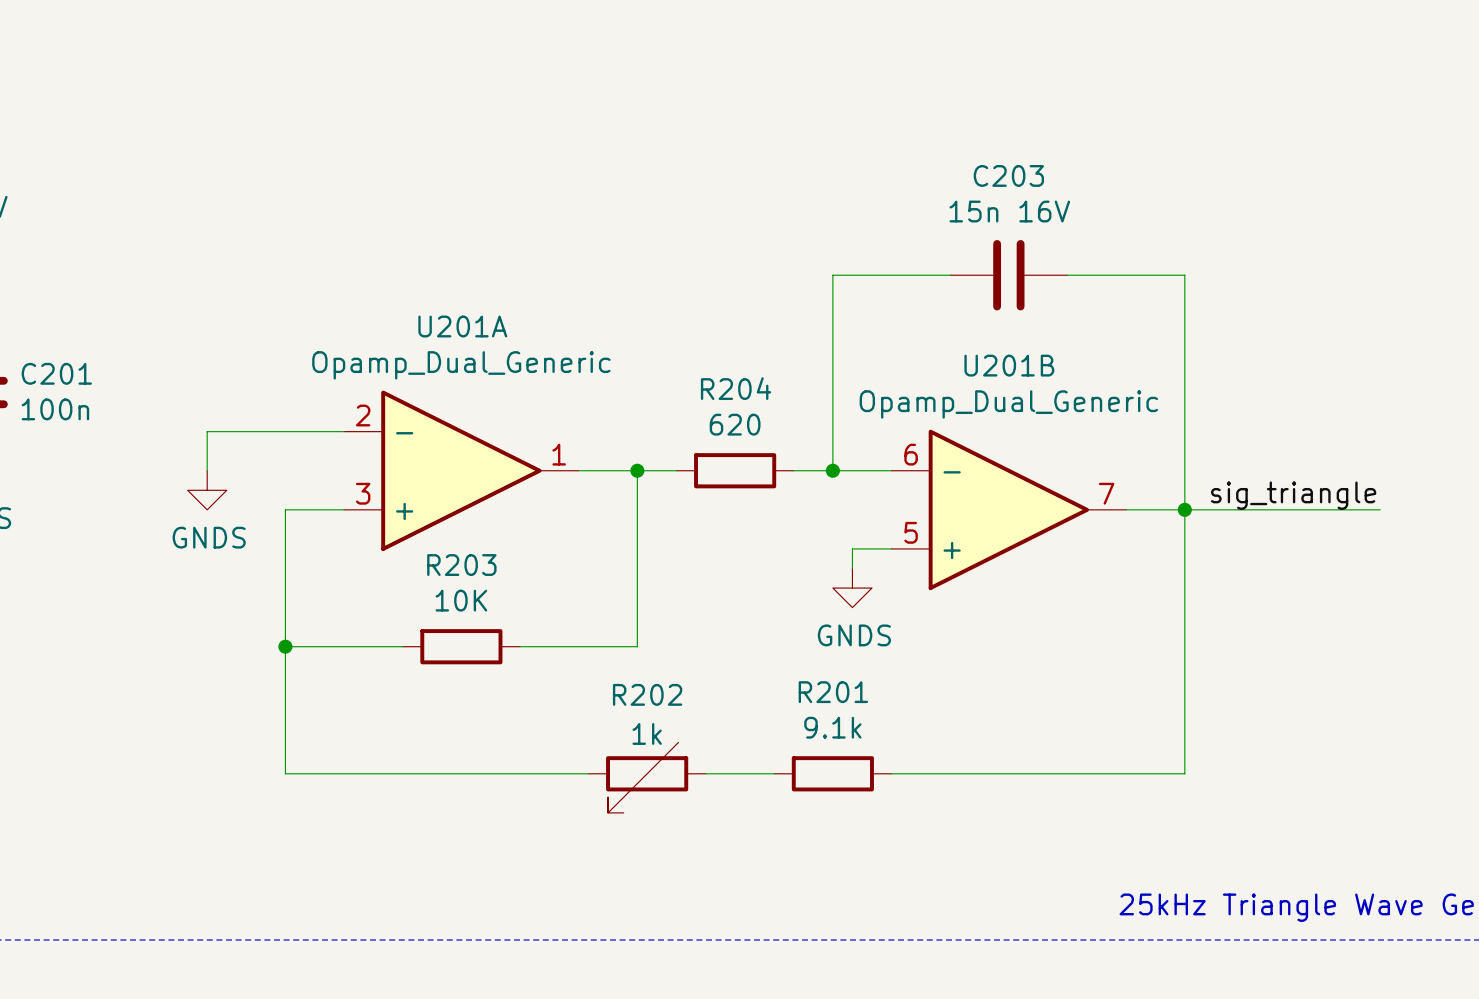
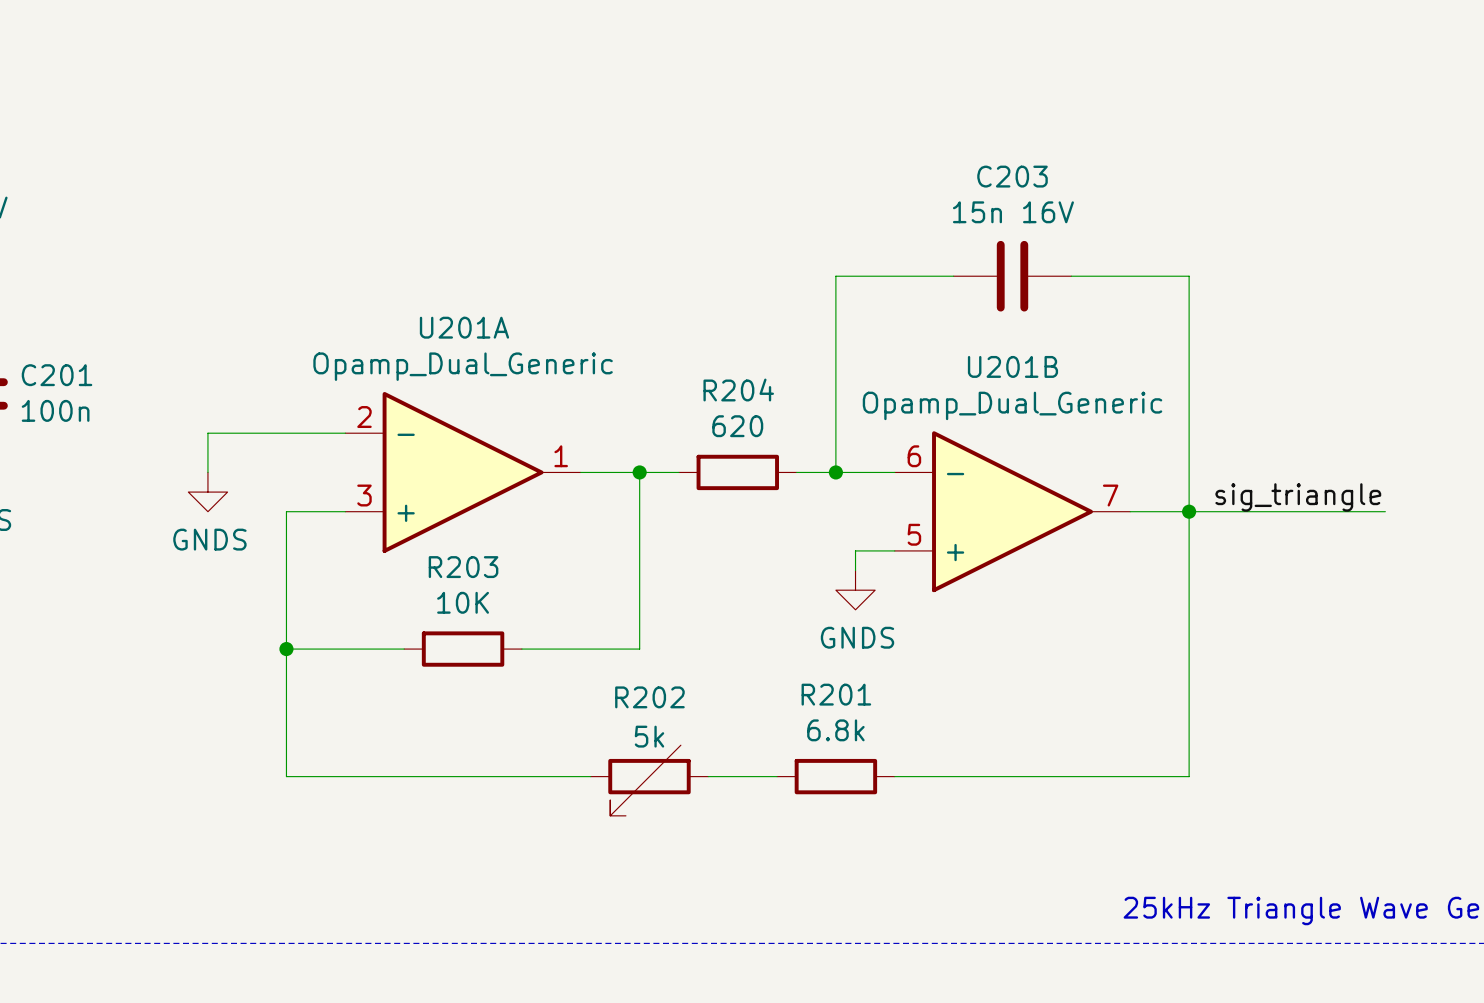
R201 value: 9.1k (832, 727) -> 6.8k (835, 730)
R202 value: 1k (647, 733) -> 5k (649, 736)

